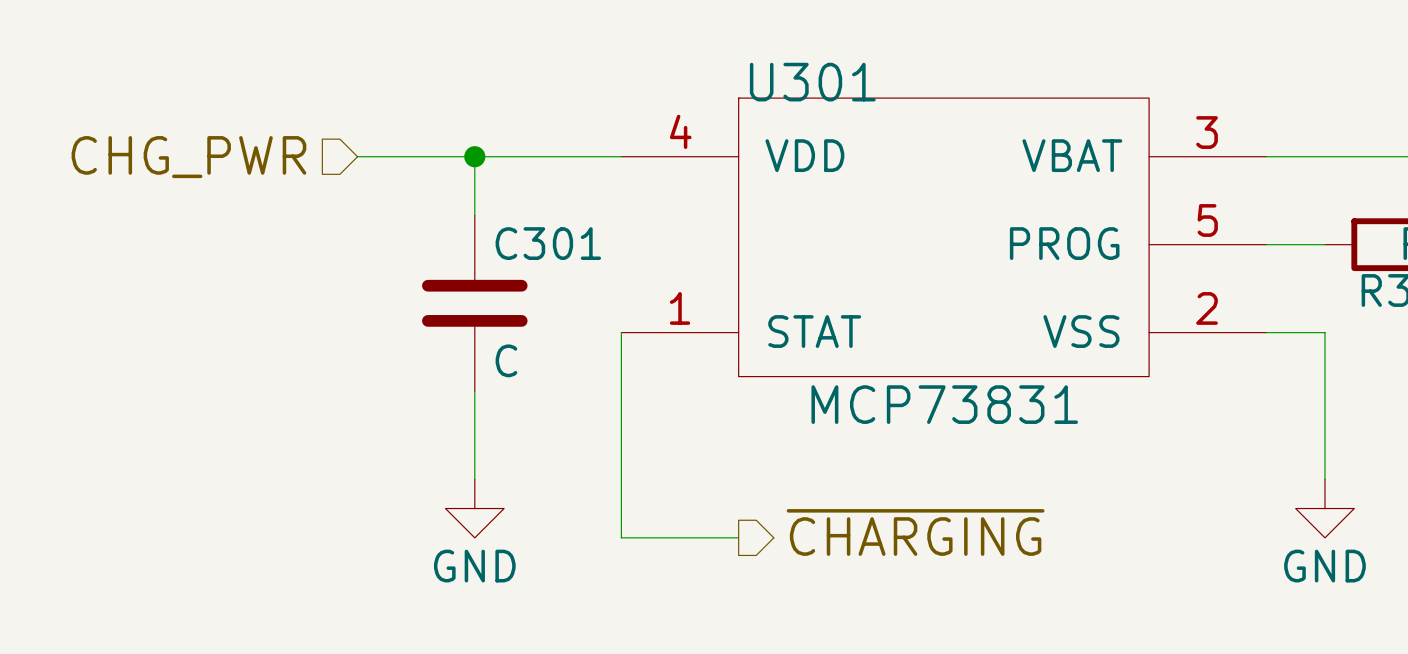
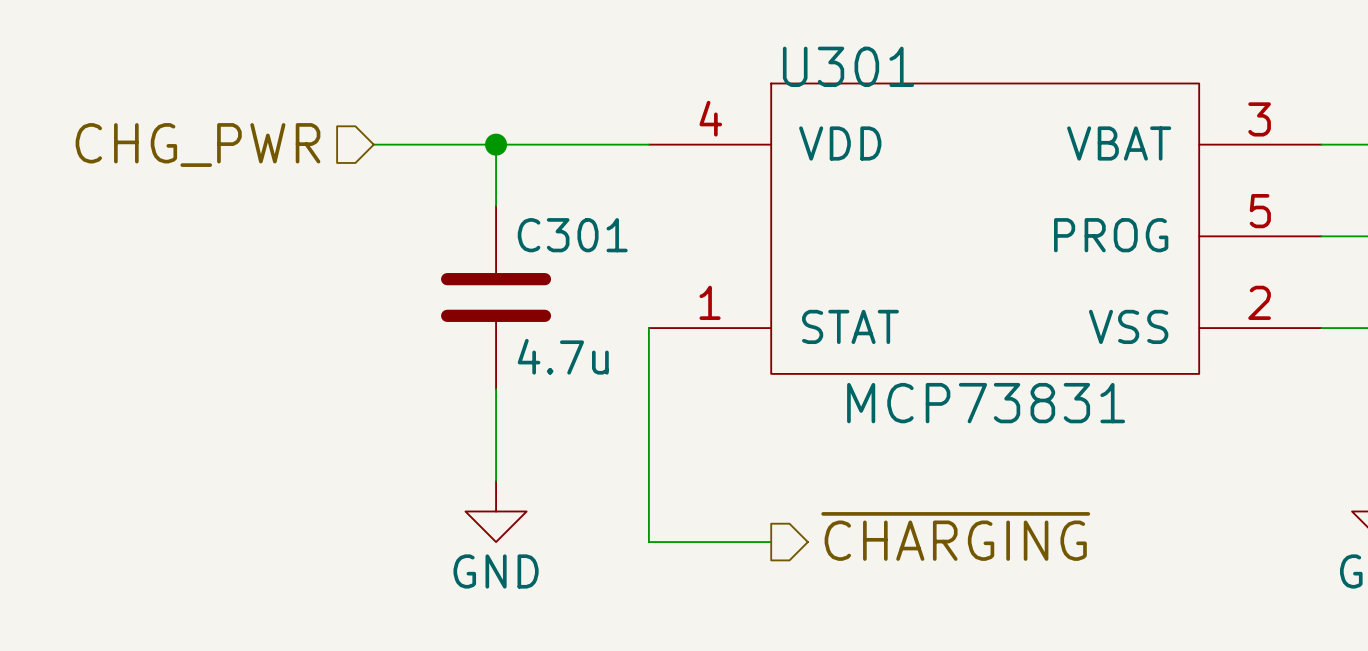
C301 value: C (506, 360) -> 4.7u (563, 356)

